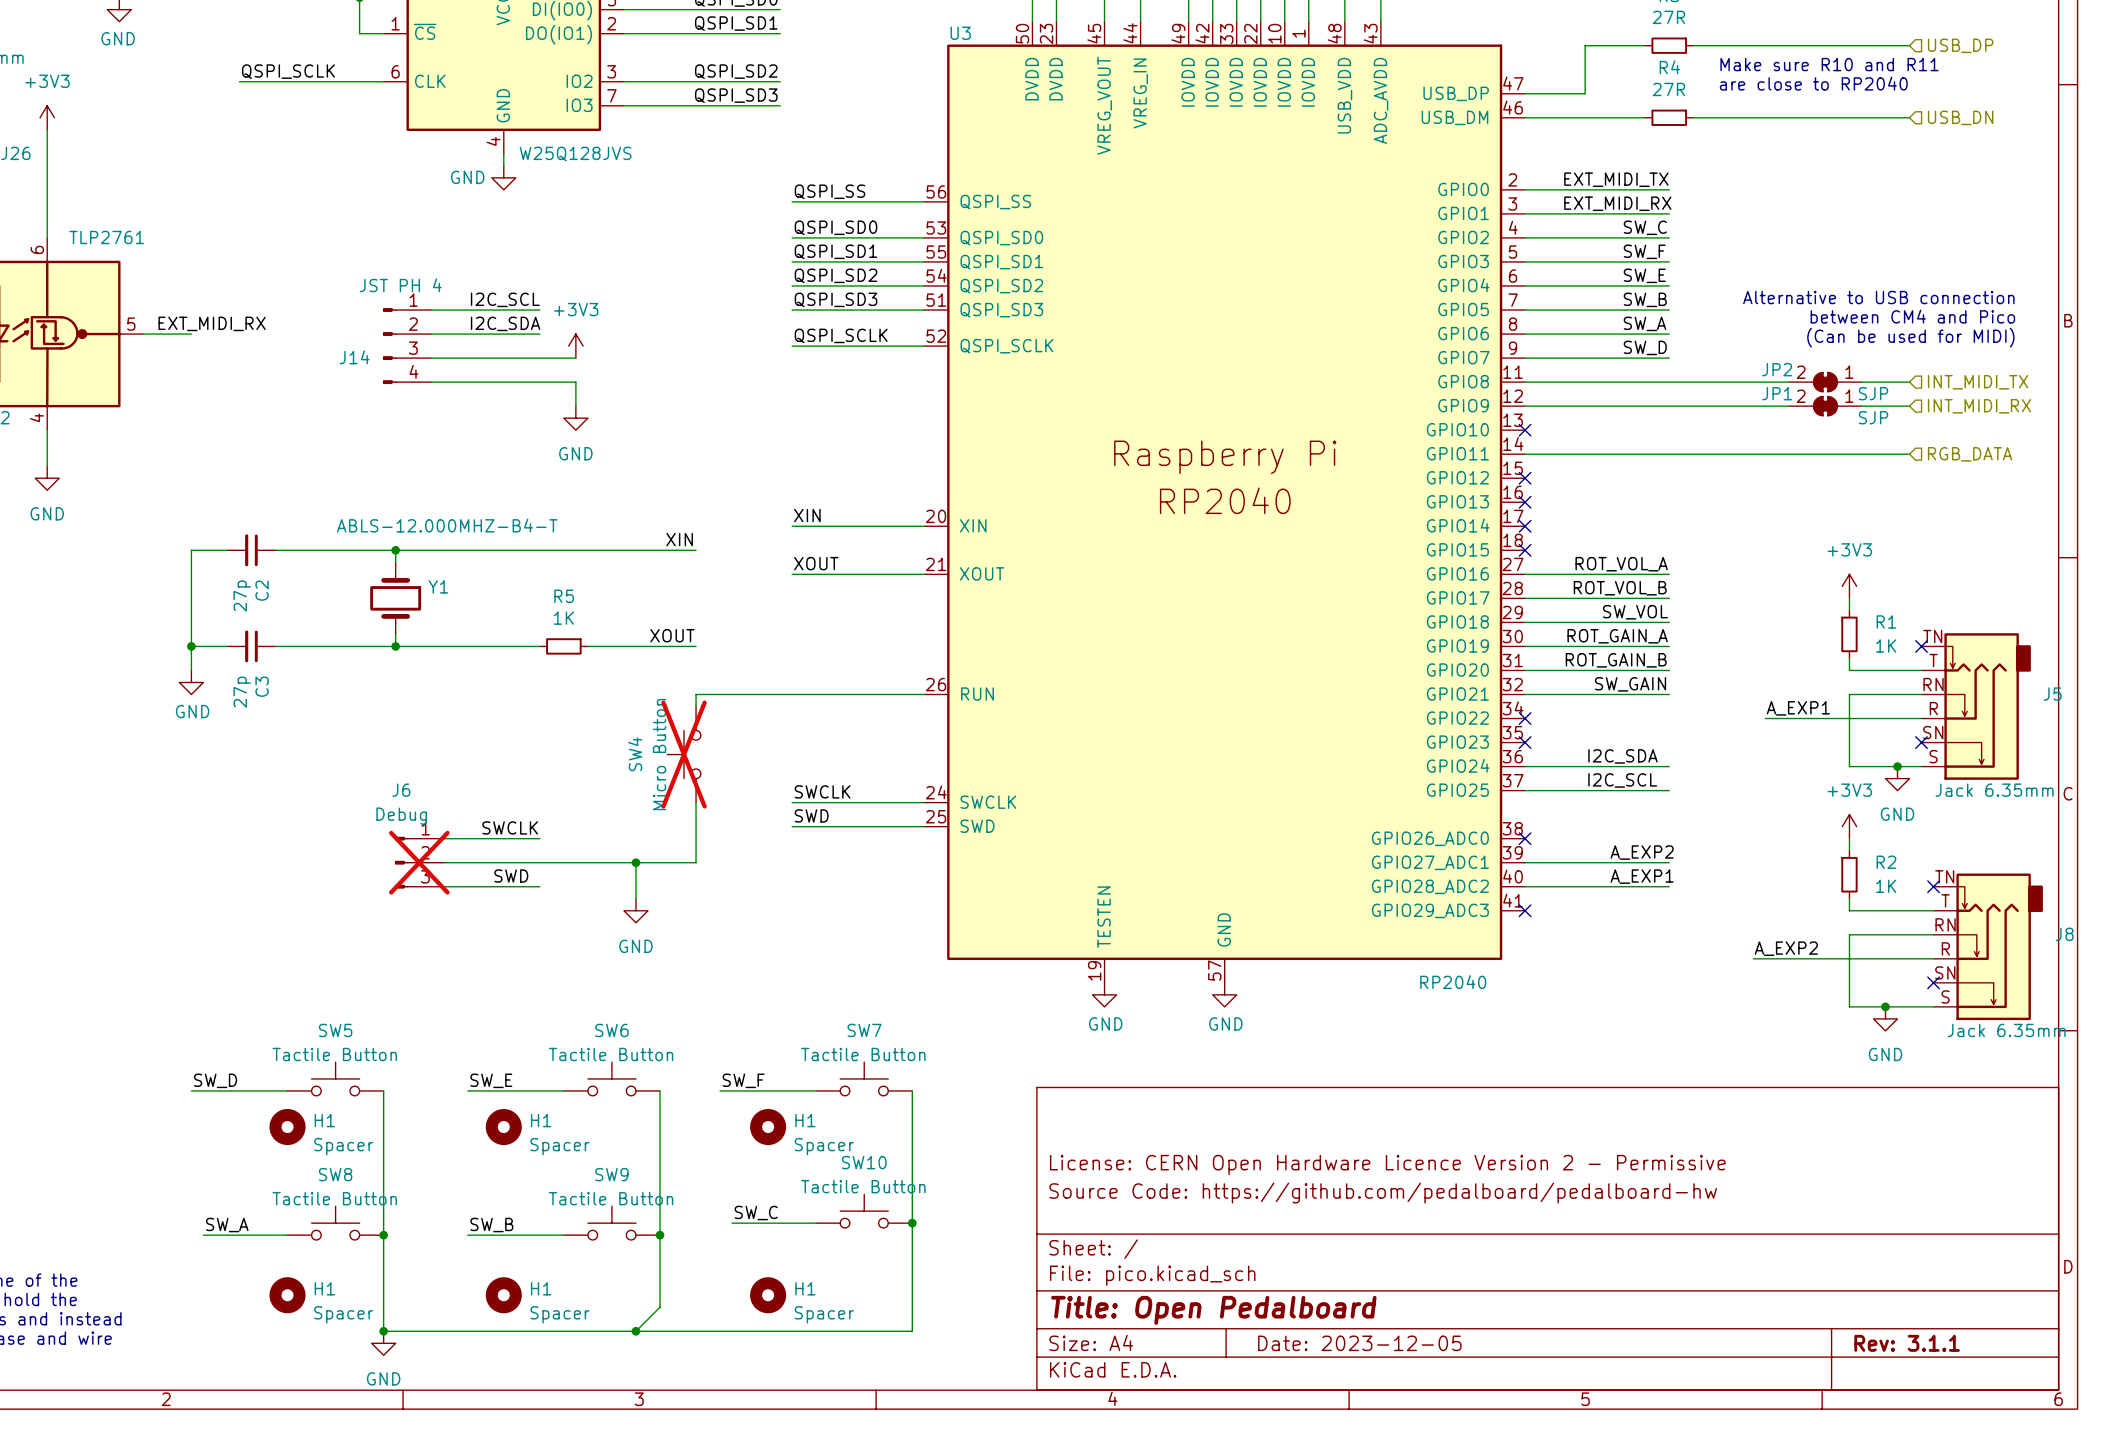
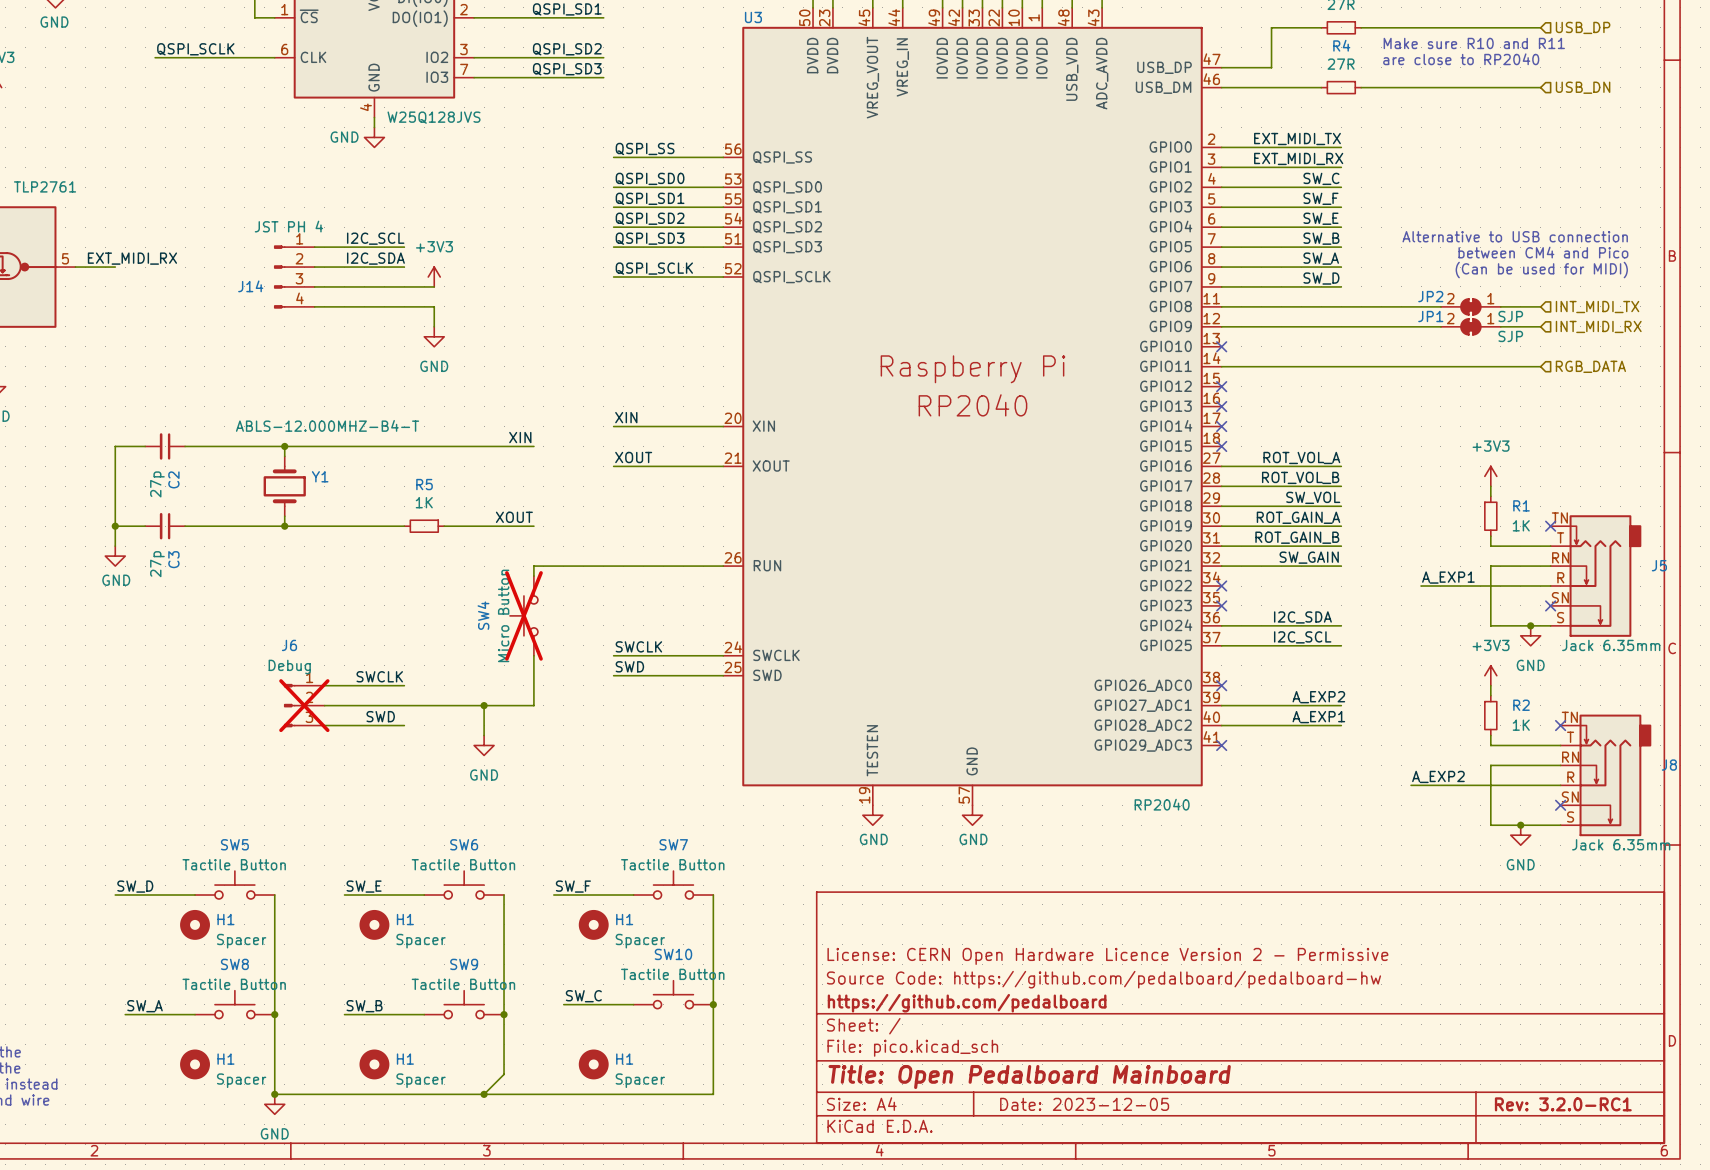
title block: none -> https://github.com/pedalboard (967, 1003)
title block: Title: Open Pedalboard (1213, 1310) -> Title: Open Pedalboard Mainboard (1029, 1077)
title block: Rev: 3.1.1 (1907, 1343) -> Rev: 3.2.0-RC1 (1563, 1104)

